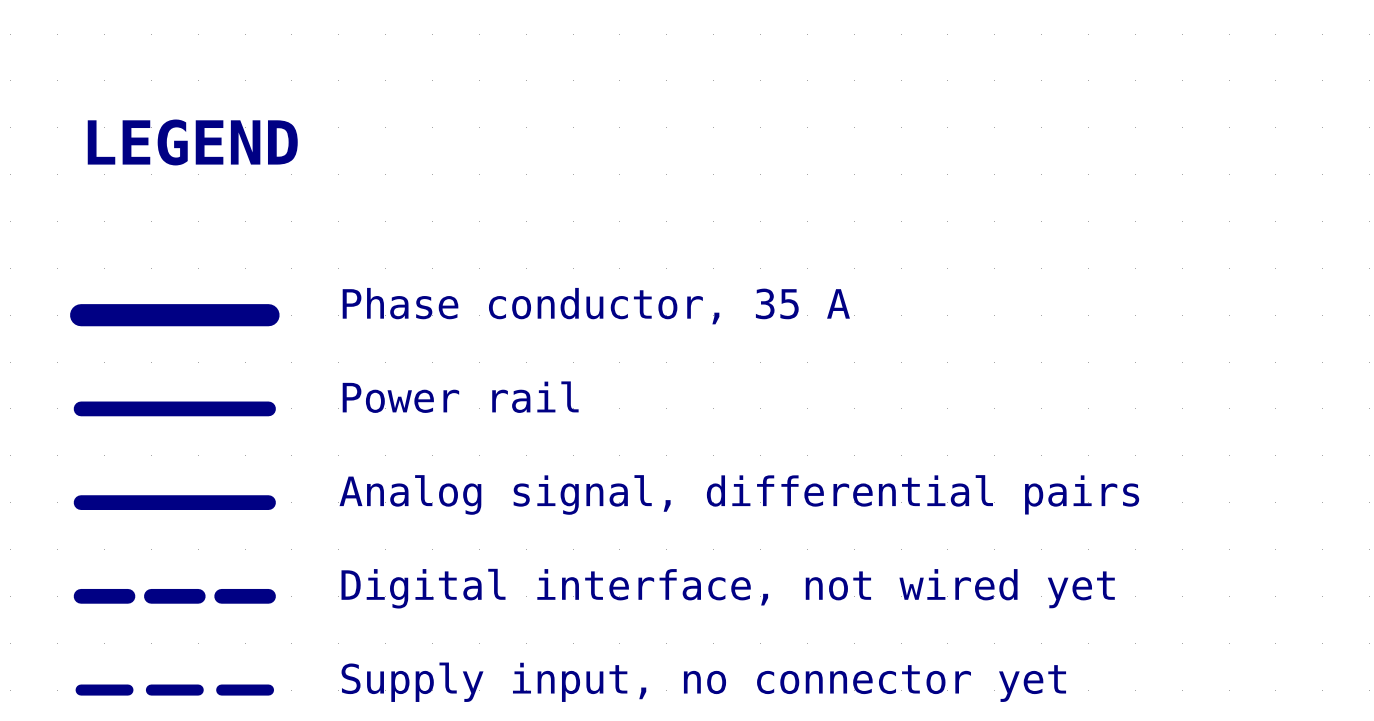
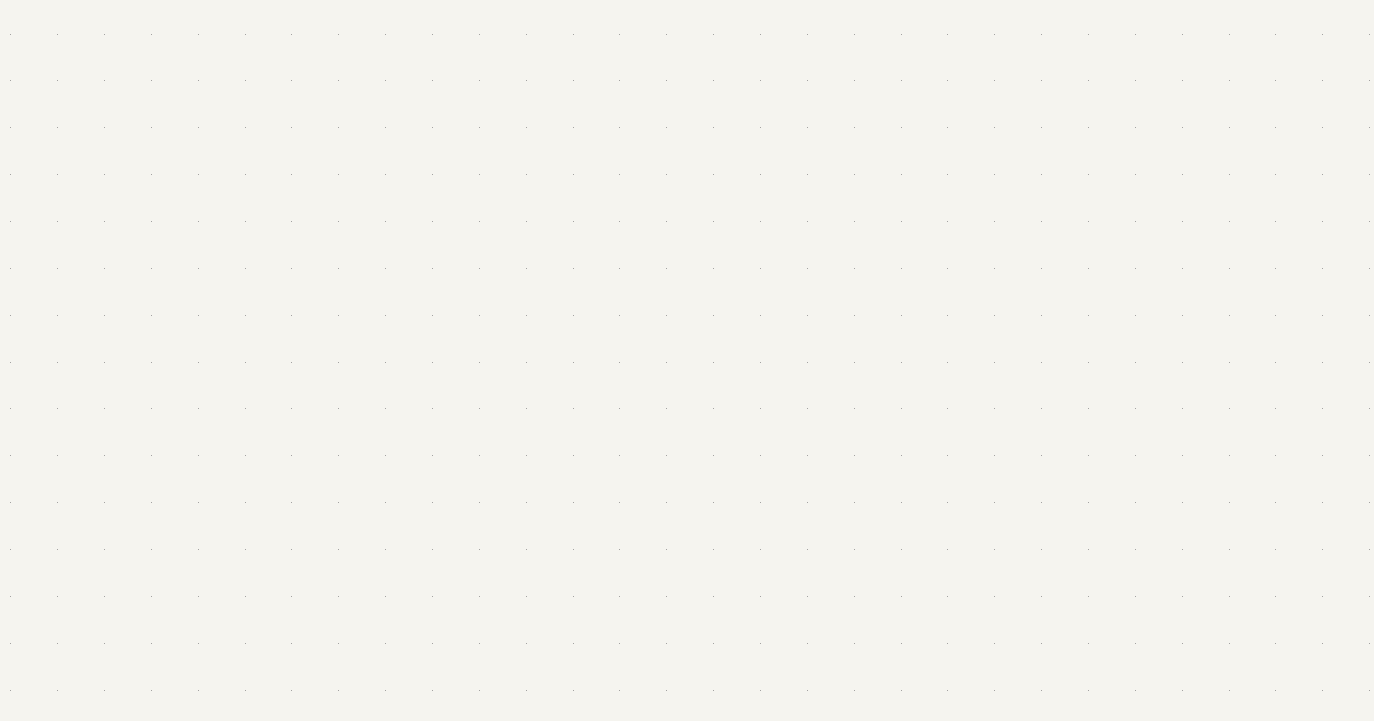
text: LEGEND (192, 142) -> none
text: Phase conductor, 35 A (596, 306) -> none
line: (81, 315) (268, 315) -> none
text: Power rail (460, 397) -> none
line: (81, 408) (268, 408) -> none
text: Analog signal, differential pairs (739, 494) -> none
line: (81, 502) (268, 502) -> none
text: Digital interface, not wired yet (728, 588) -> none
line: (81, 596) (127, 596) -> none
line: (151, 596) (198, 596) -> none
line: (221, 596) (268, 596) -> none
text: Supply input, no connector yet (703, 682) -> none
line: (81, 690) (127, 690) -> none
line: (151, 690) (198, 690) -> none
line: (221, 690) (268, 690) -> none

